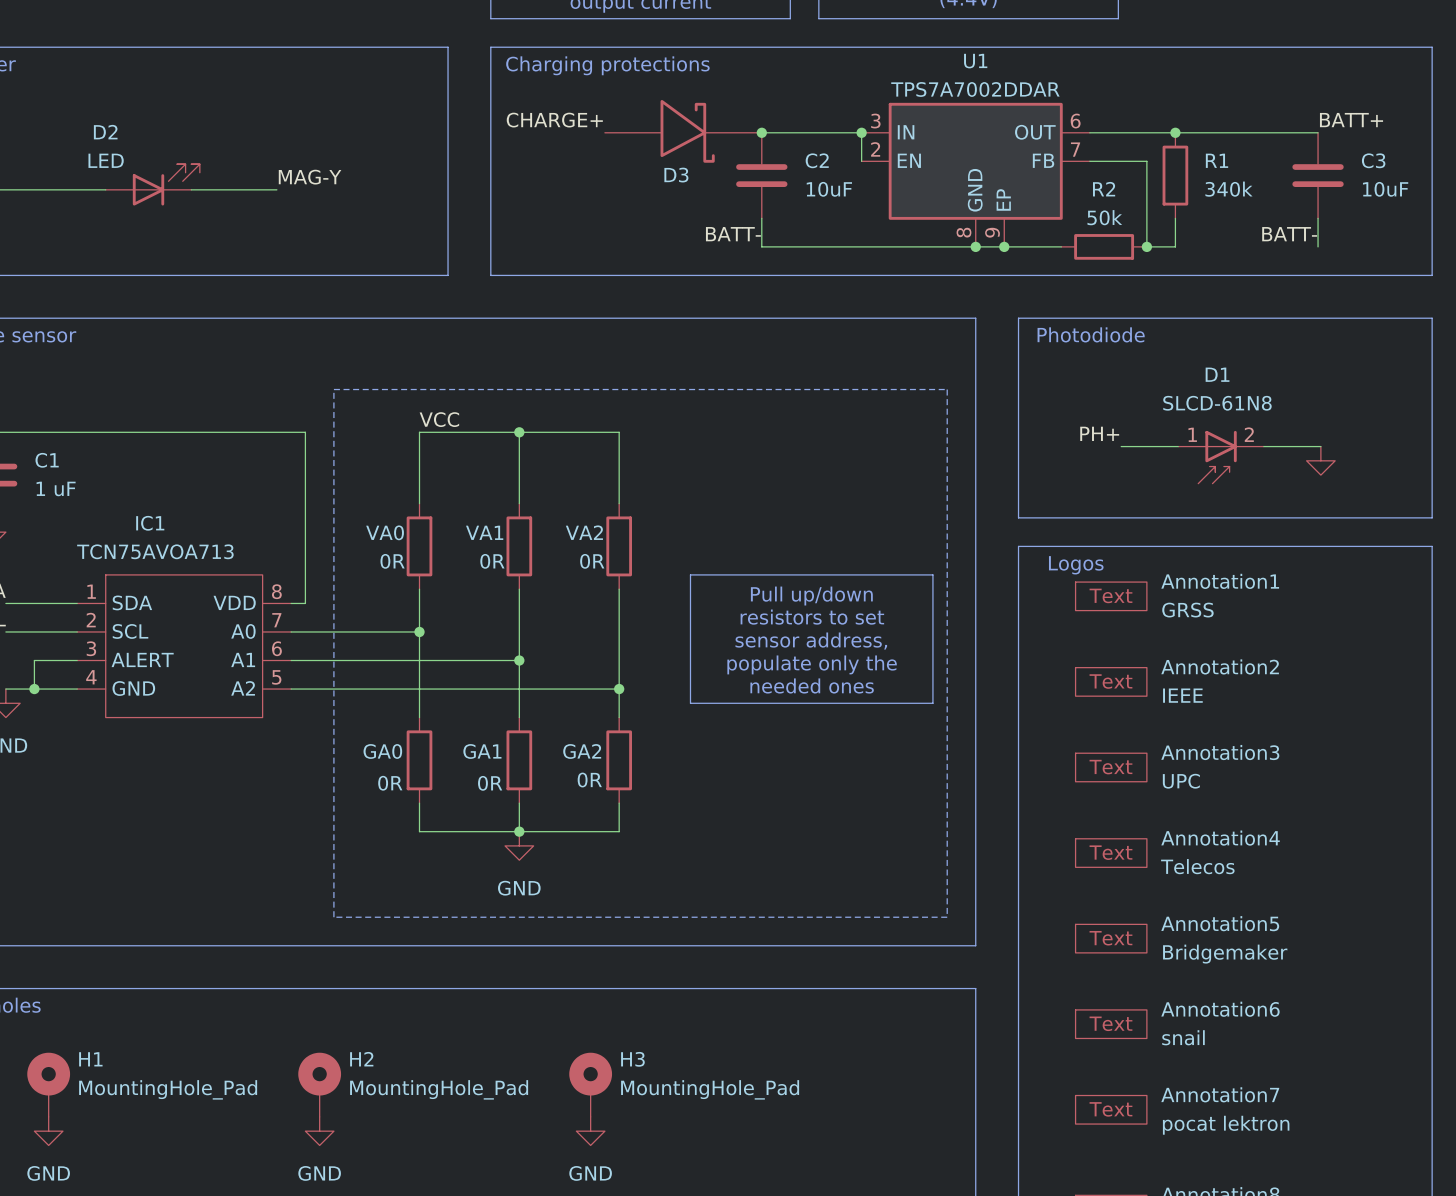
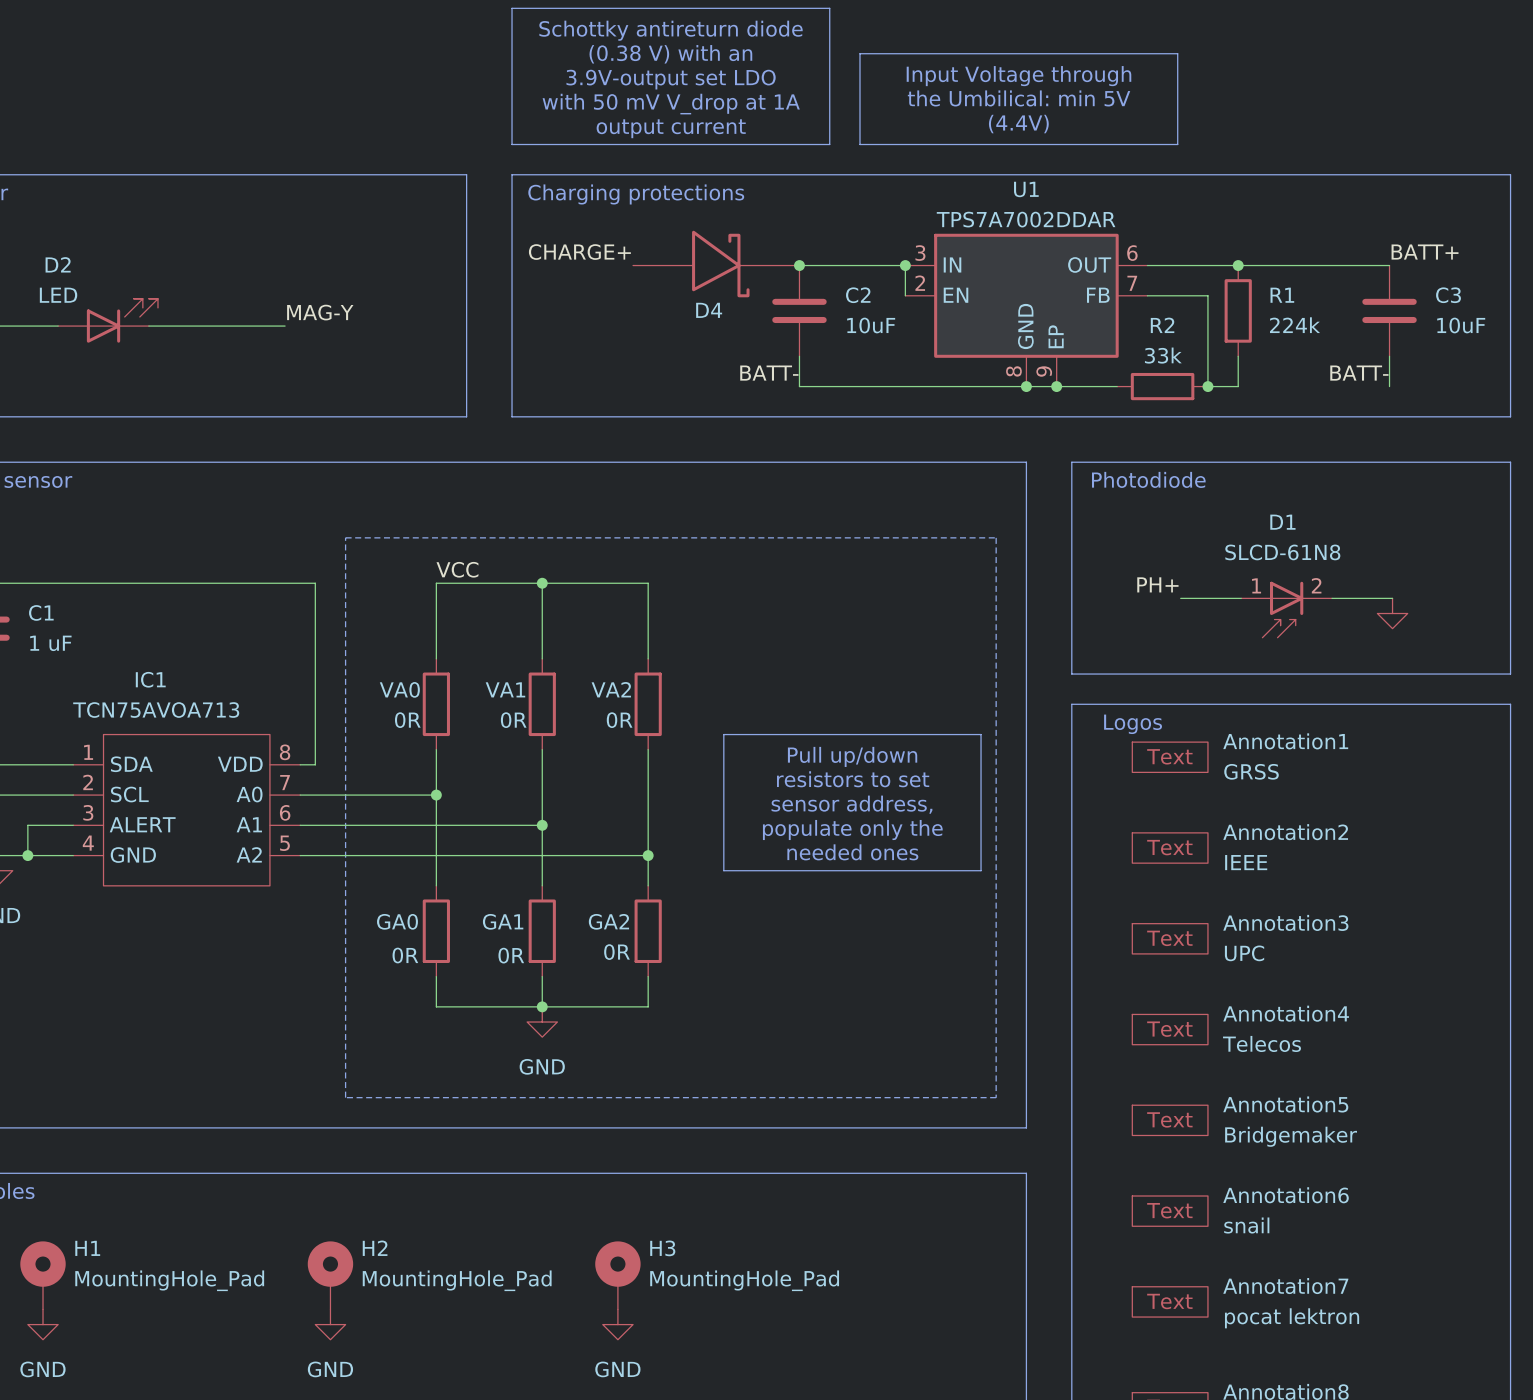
D3 name: D3 (676, 175) -> D4 (709, 310)
D2 position: (152, 184) -> (108, 320)
R1 value: 340k (1228, 189) -> 224k (1295, 325)
R2 value: 50k (1104, 217) -> 33k (1163, 355)

